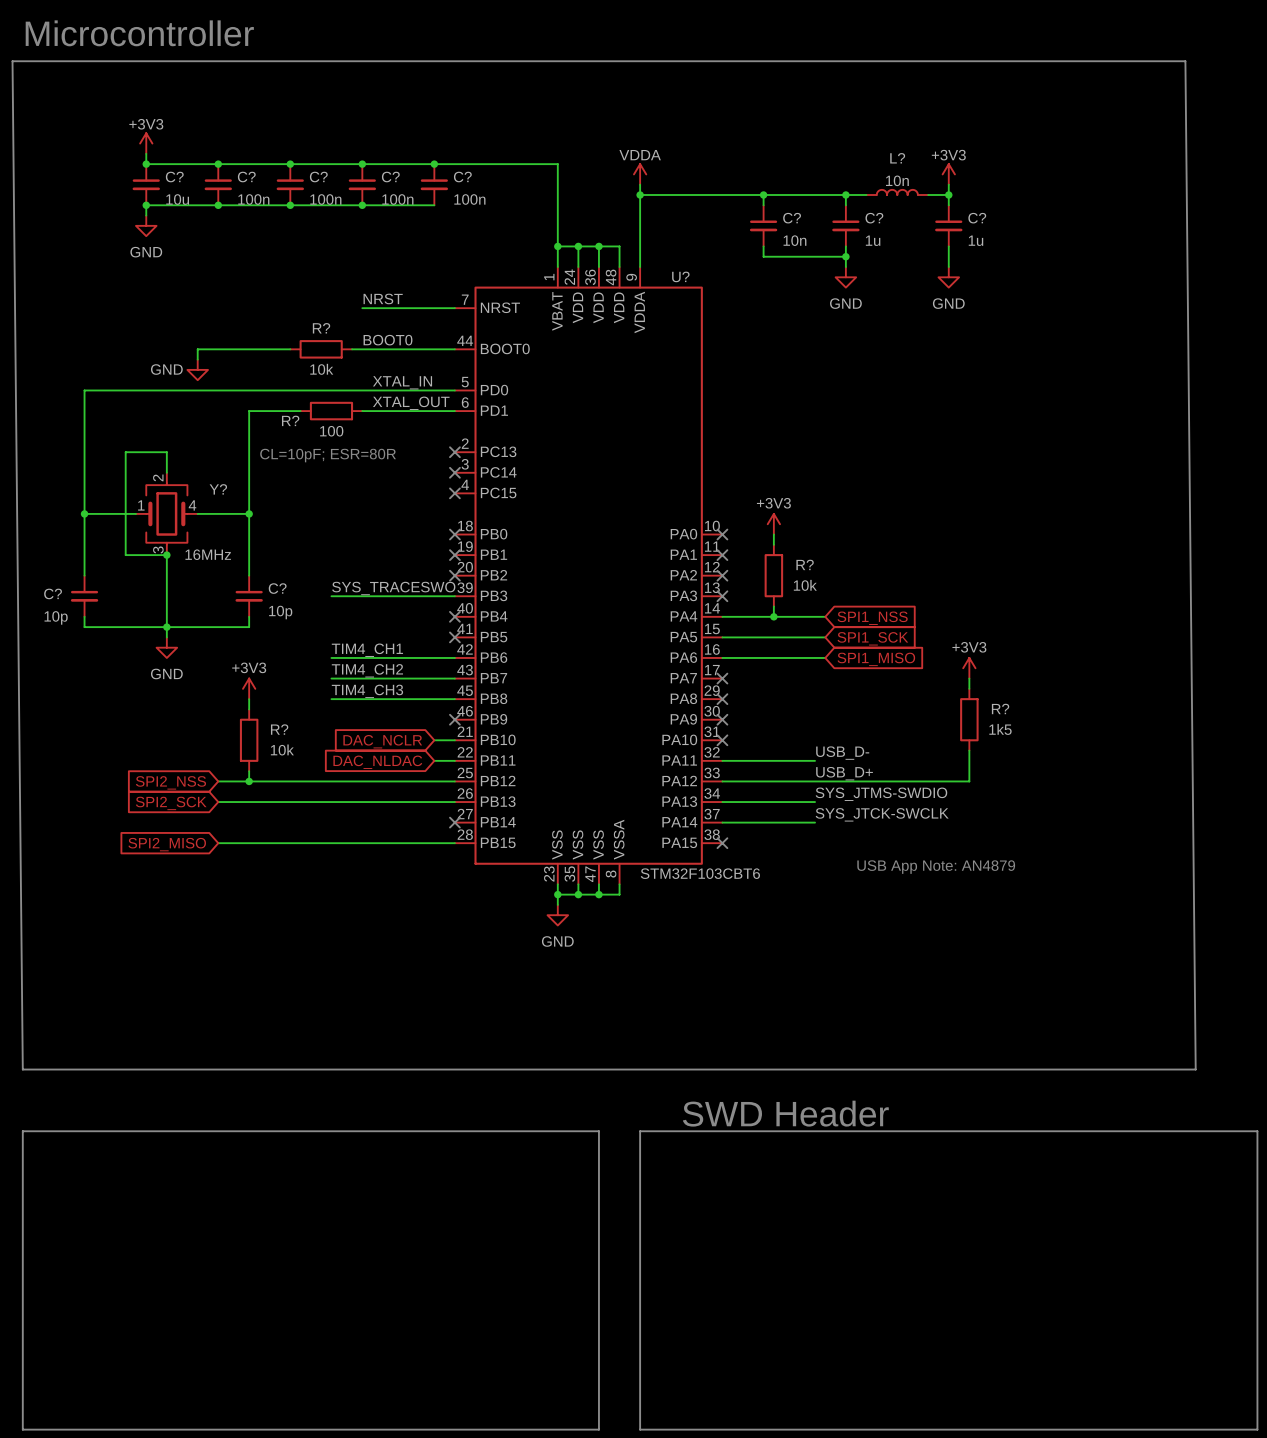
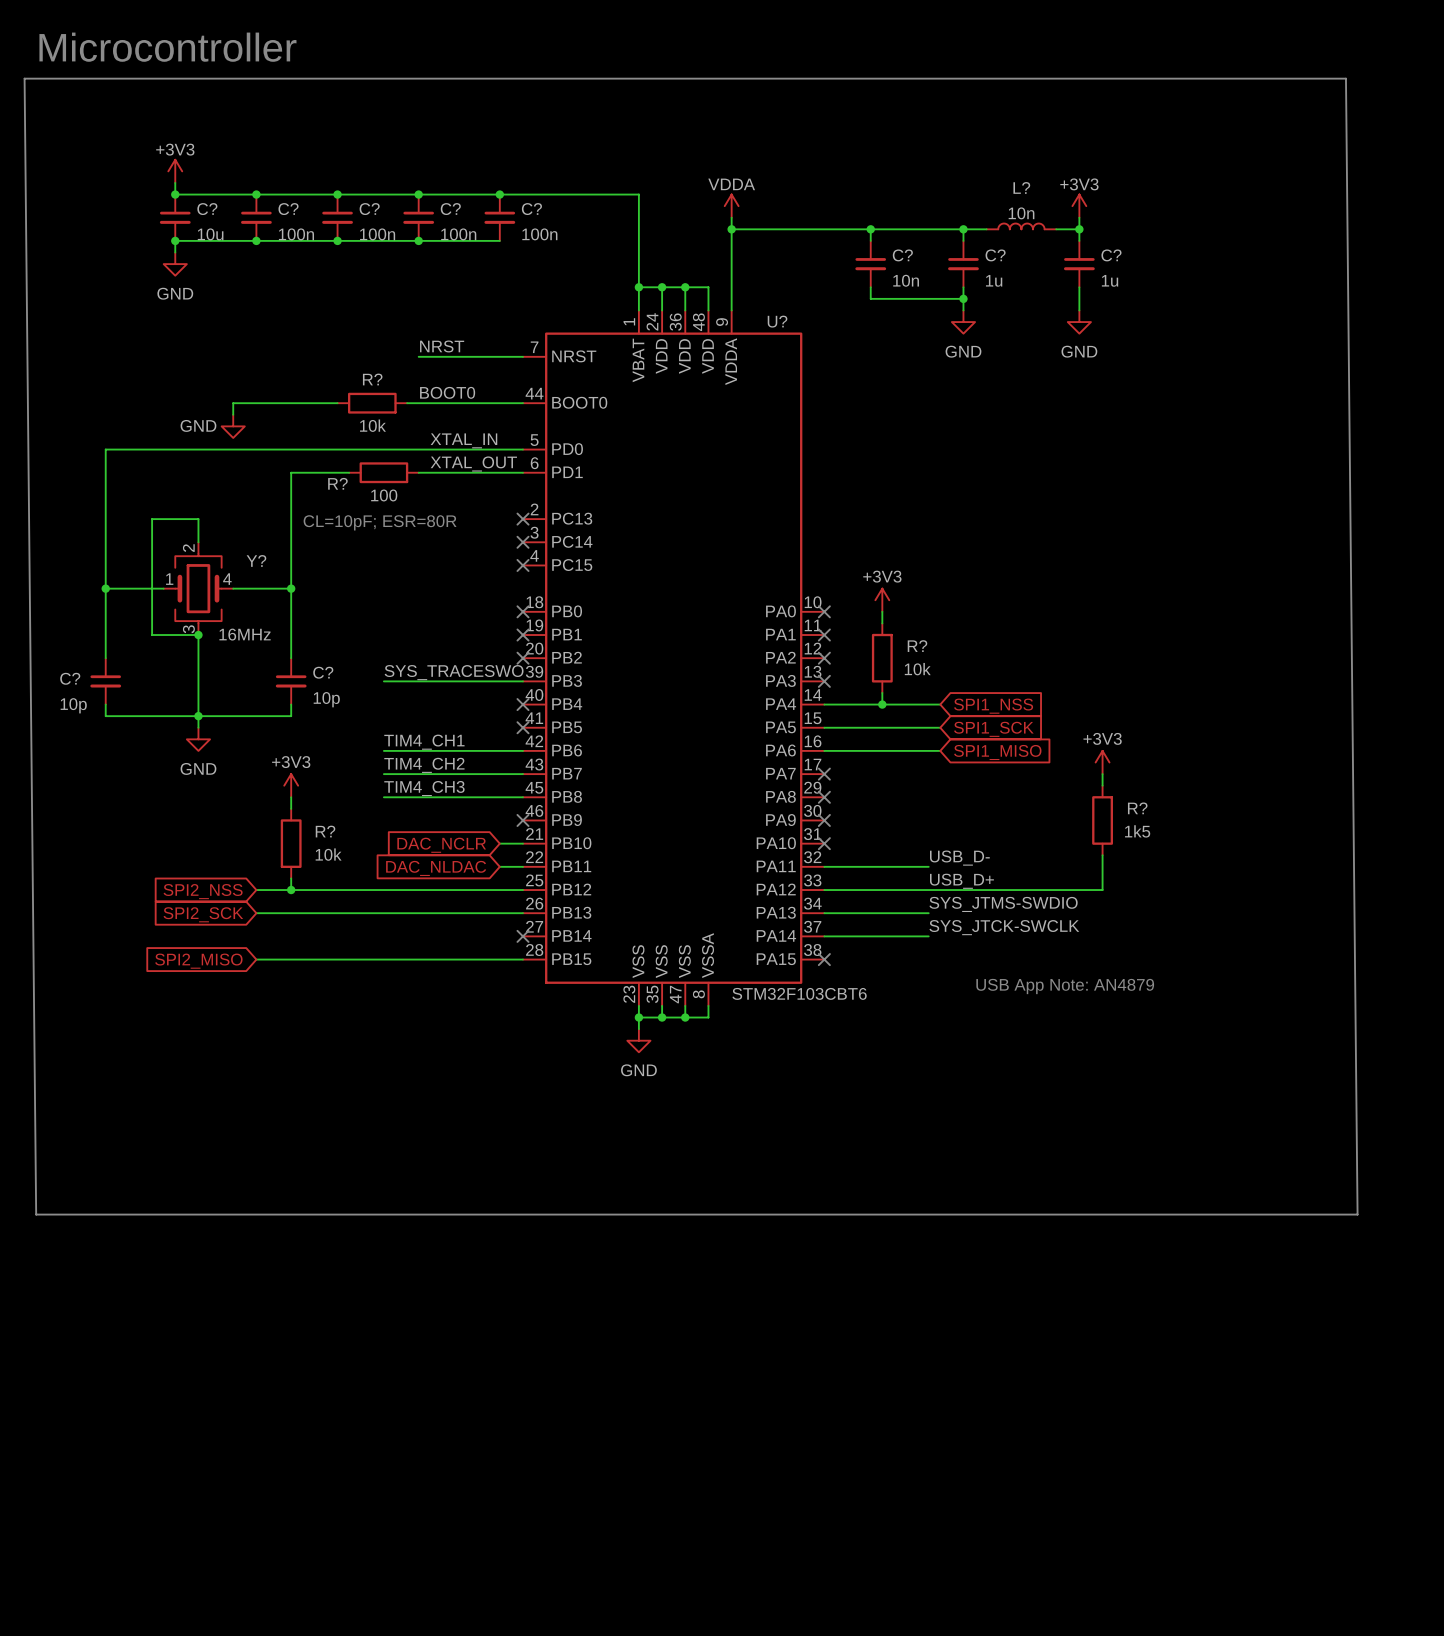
text: SWD Header (785, 1113) -> none
line: (22, 1131) (598, 1131) (598, 1429) (22, 1429) (22, 1131) -> none
line: (640, 1131) (1257, 1131) (1257, 1429) (640, 1429) (640, 1131) -> none

